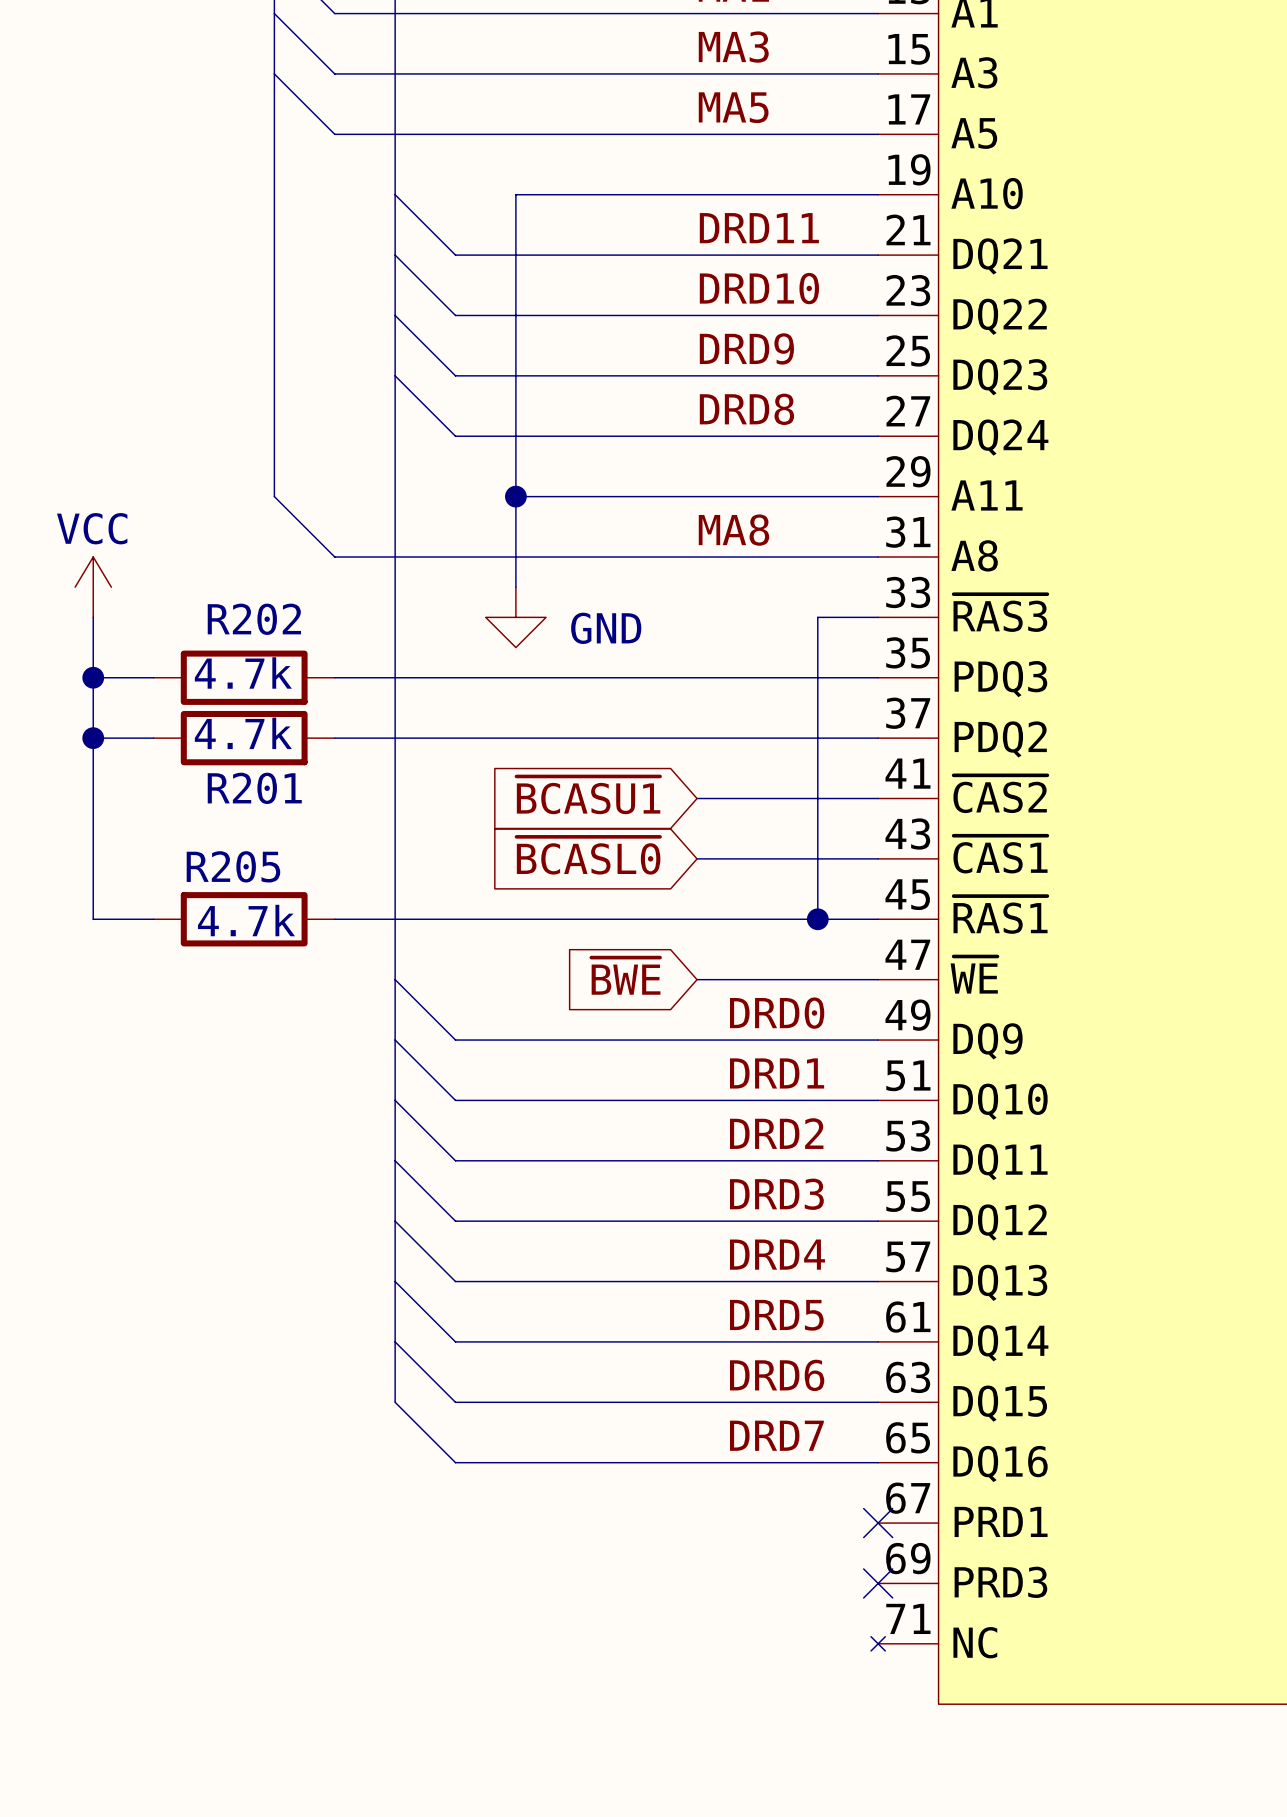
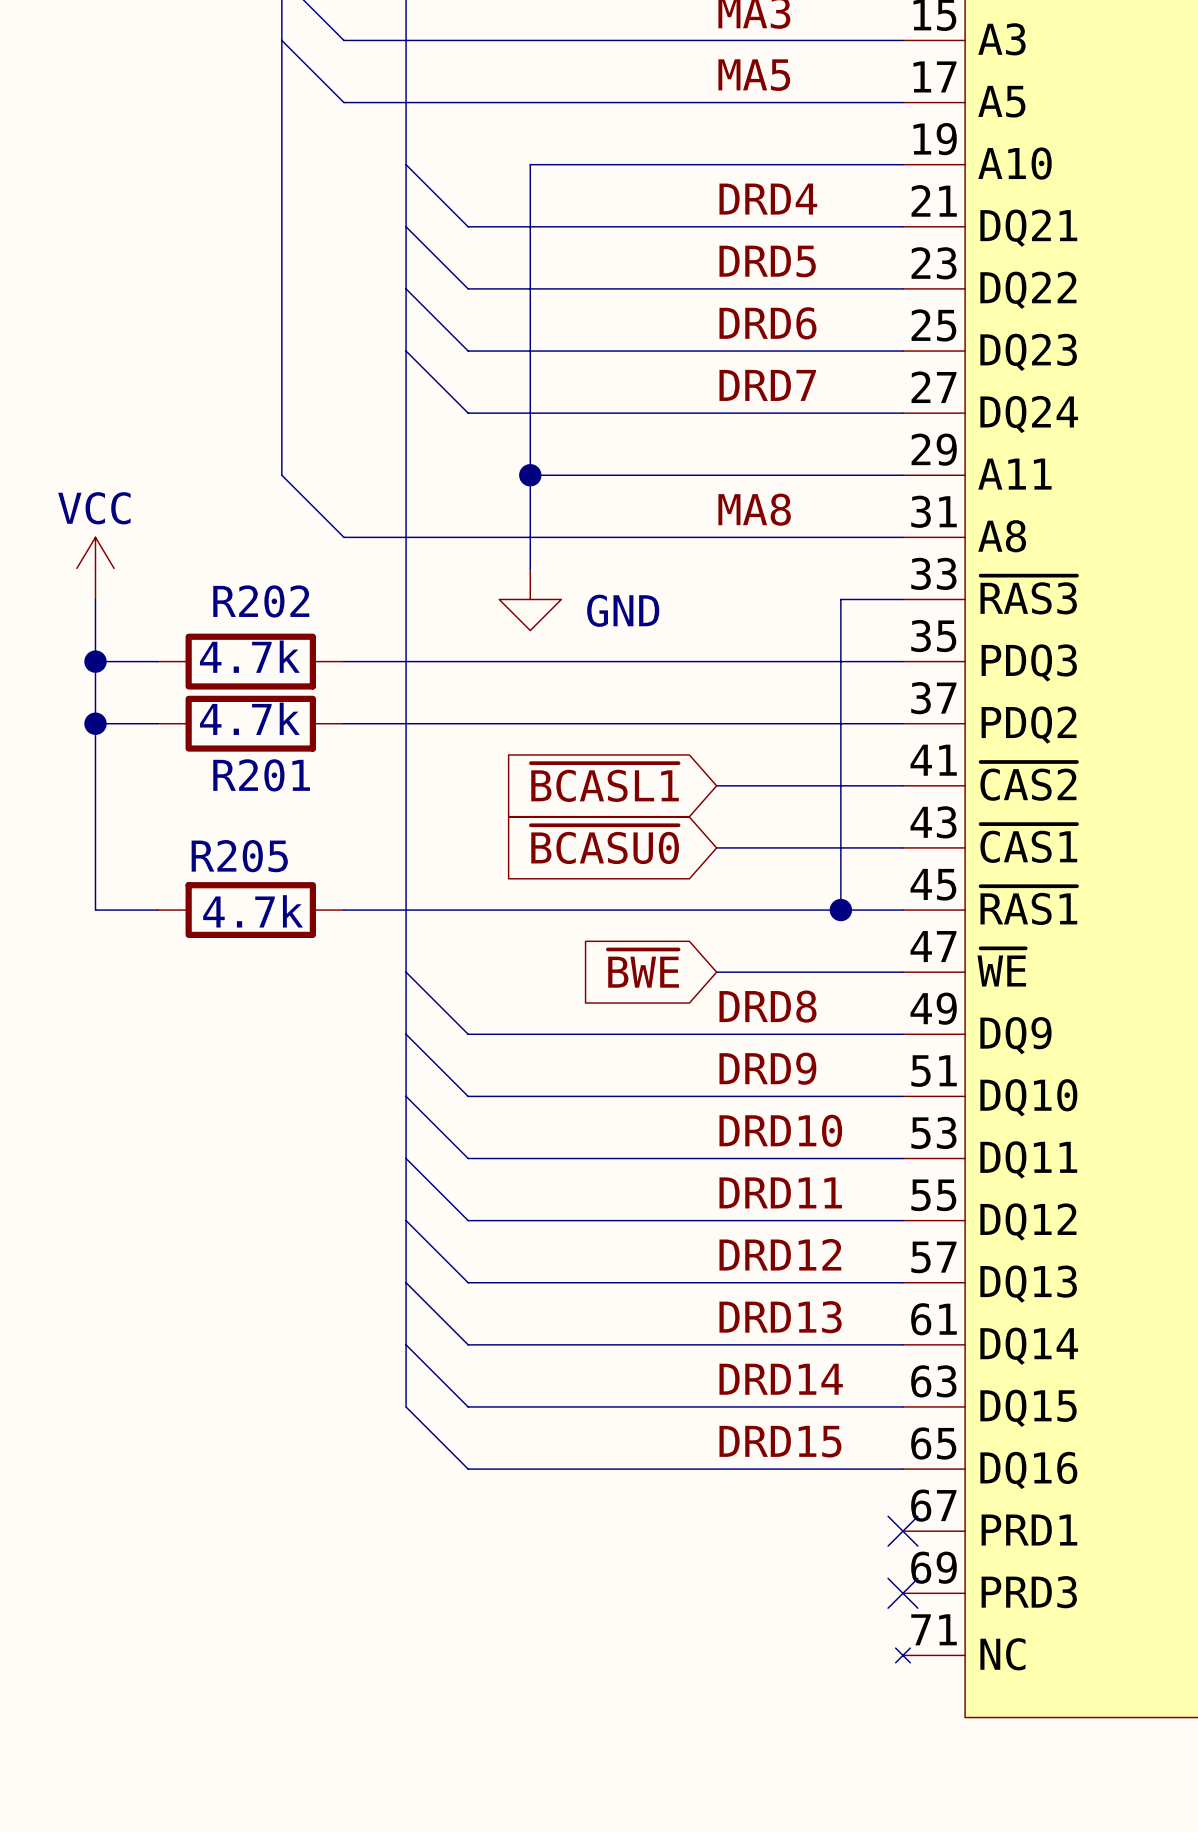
label: DRD11 (759, 228) -> DRD4 (768, 199)
label: DRD10 (759, 288) -> DRD5 (767, 261)
label: DRD9 (746, 348) -> DRD6 (767, 323)
label: DRD8 (746, 409) -> DRD7 (767, 385)
global label: ~{BCASU1} (588, 795) -> ~{BCASL1} (604, 782)
global label: ~{BCASL0} (588, 855) -> ~{BCASU0} (604, 844)
label: DRD0 (777, 1013) -> DRD8 (767, 1006)
label: DRD1 (777, 1073) -> DRD9 (767, 1068)
label: DRD2 (776, 1133) -> DRD10 (780, 1130)
label: DRD3 (776, 1194) -> DRD11 (780, 1192)
label: DRD4 (777, 1254) -> DRD12 (780, 1254)
label: DRD5 (776, 1315) -> DRD13 (780, 1317)
label: DRD6 (777, 1375) -> DRD14 (781, 1379)
label: DRD7 (776, 1435) -> DRD15 (780, 1441)

